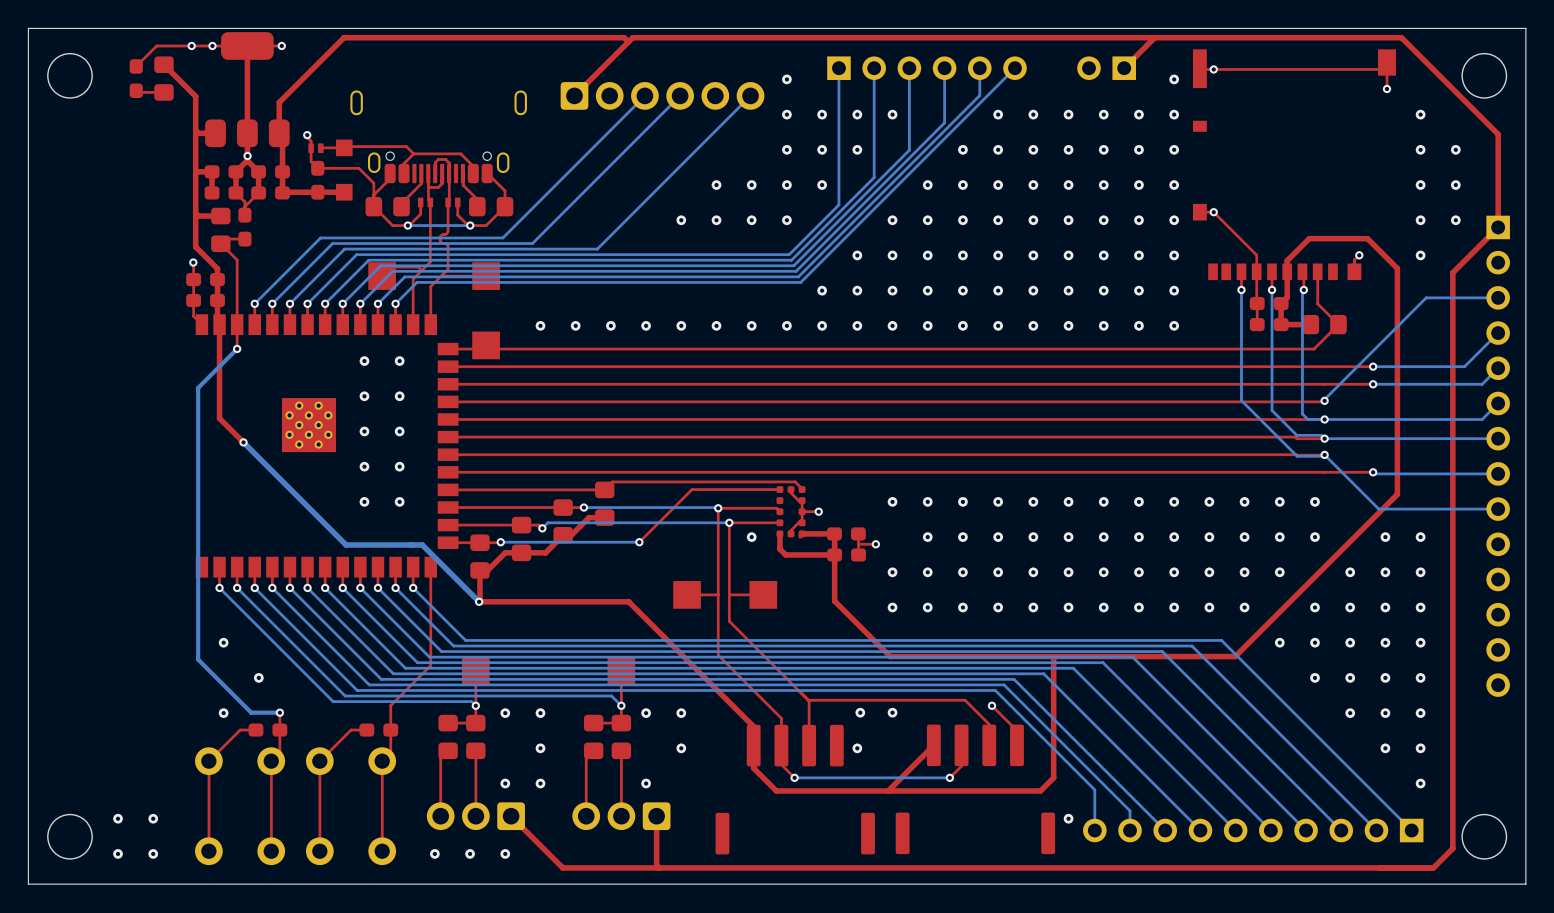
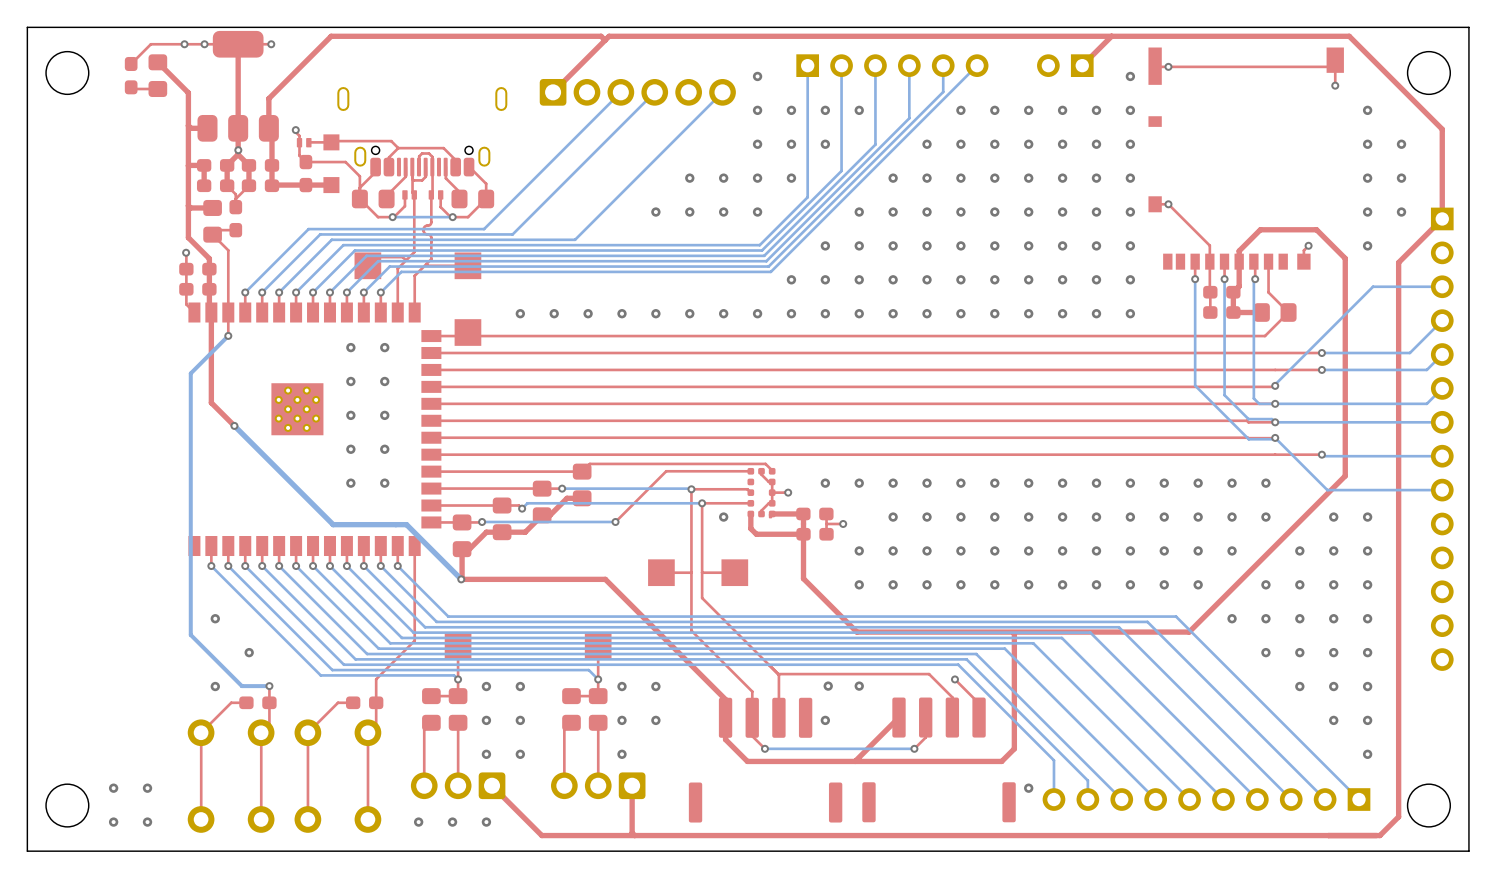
via: none -> (825, 483)
via: none -> (486, 720)
via: none -> (621, 720)

